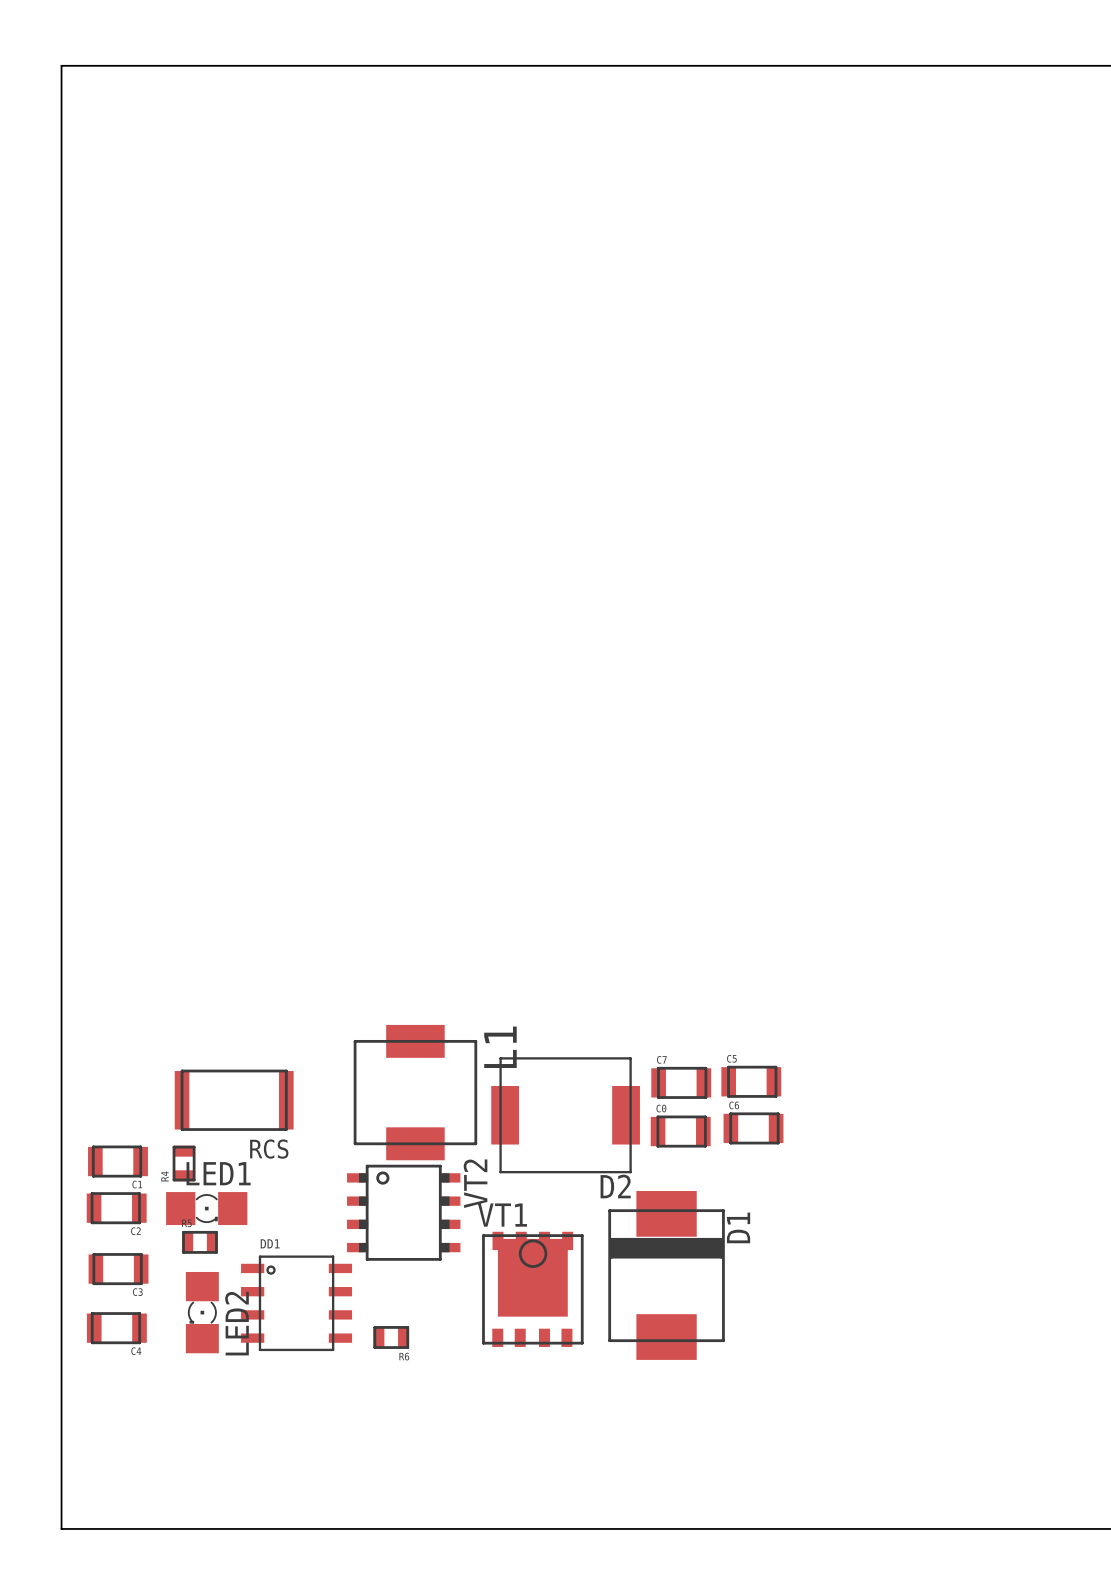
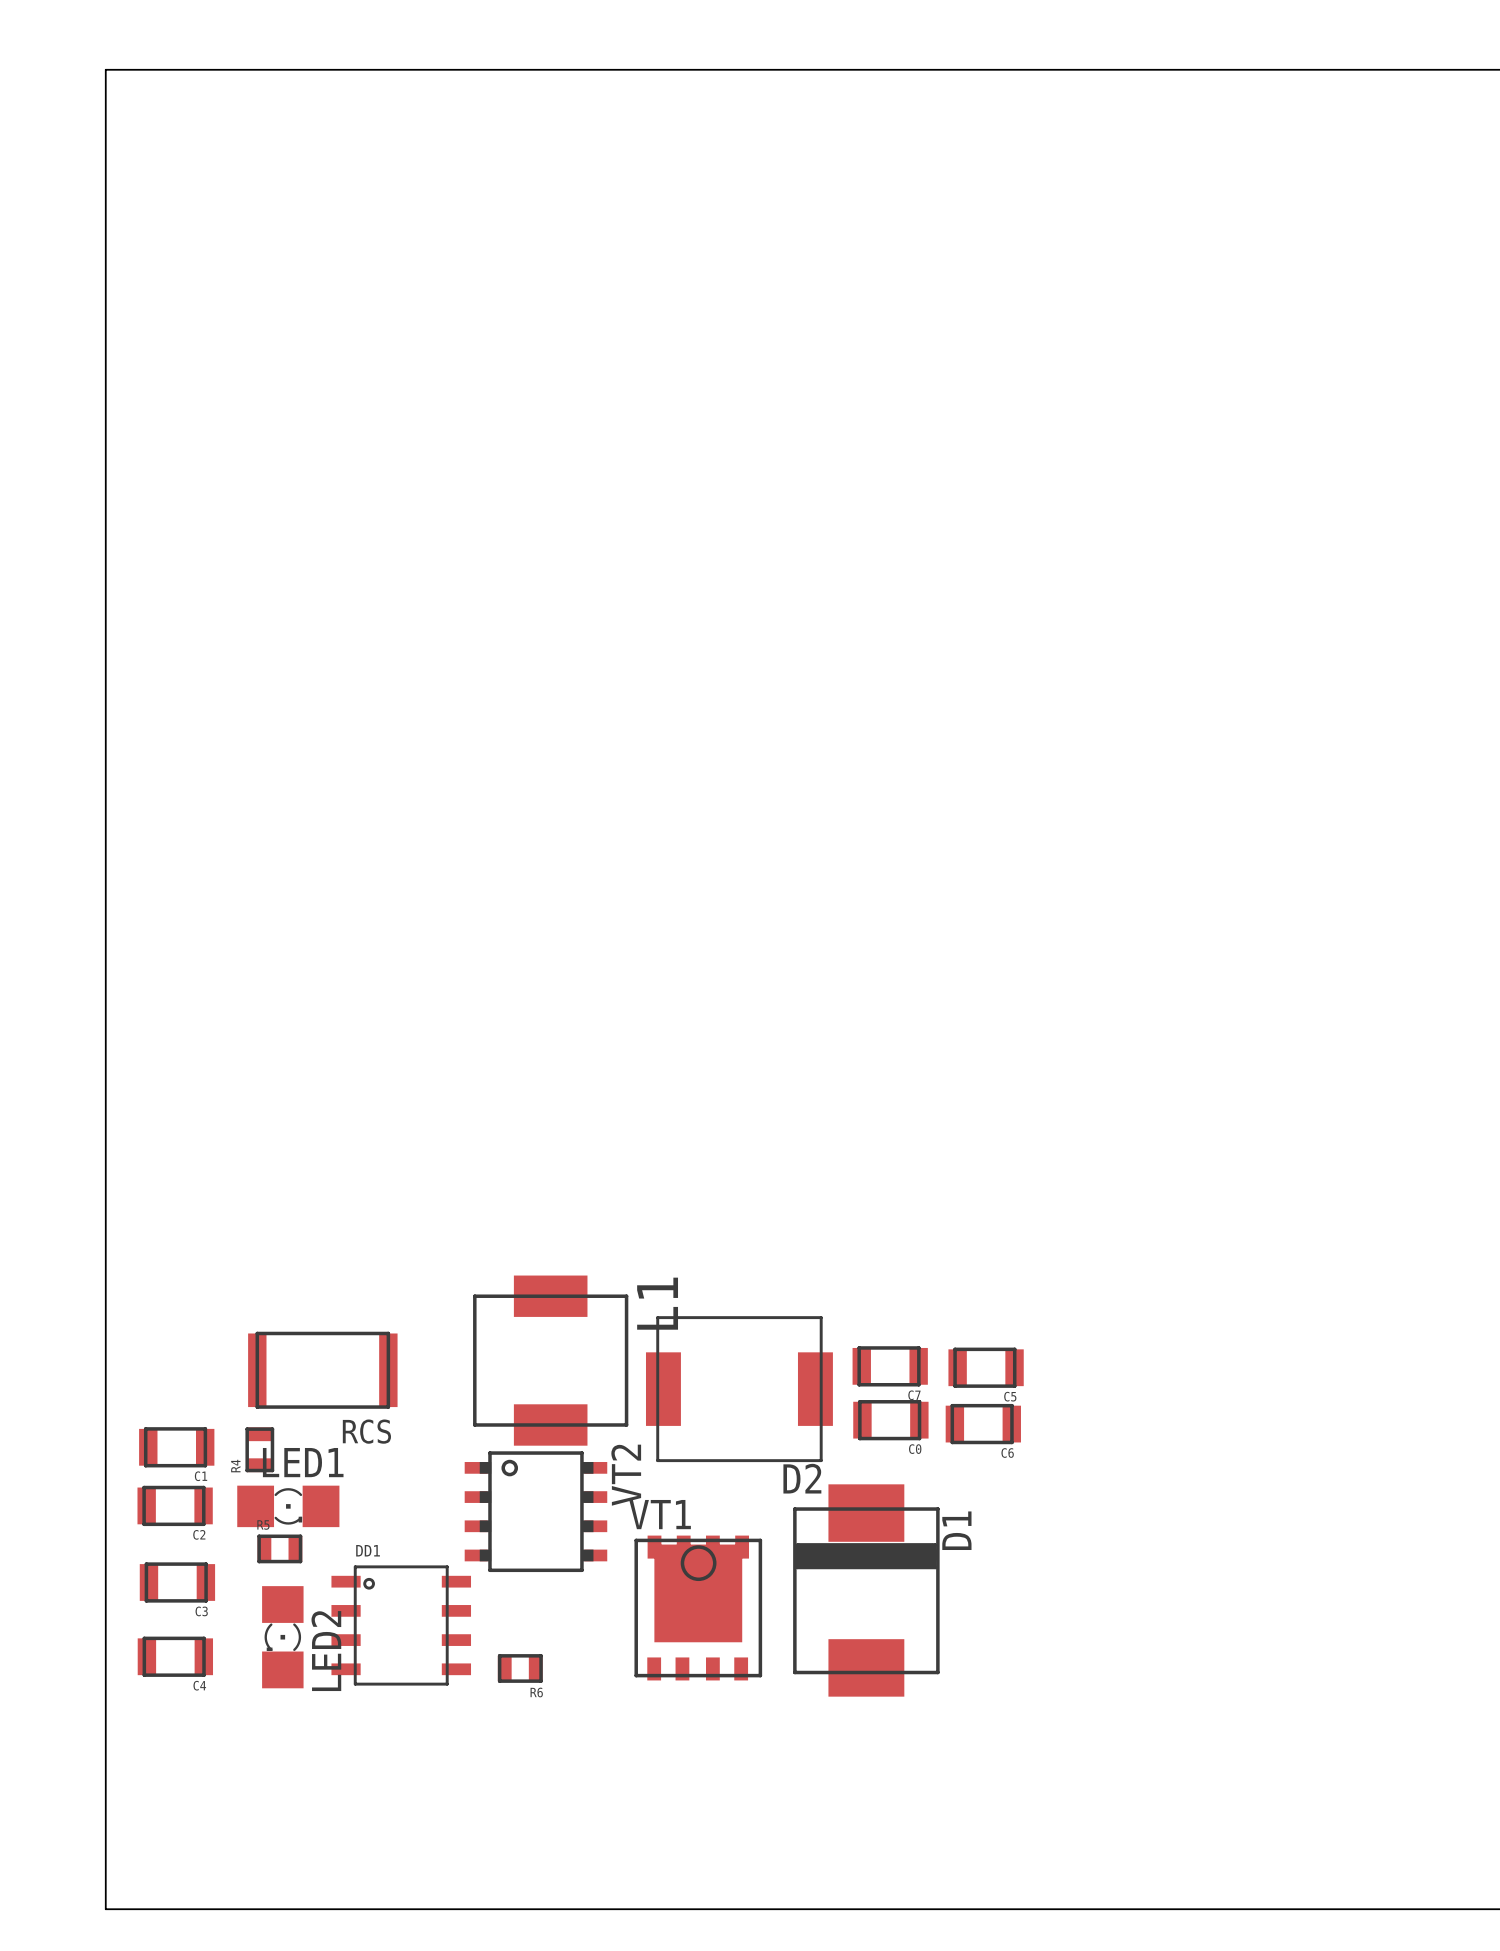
C5 rotation: 0° (751, 1081) -> 180° (986, 1367)
C7 rotation: 0° (681, 1082) -> 180° (890, 1366)
C6 rotation: 0° (753, 1128) -> 180° (983, 1424)
C0 rotation: 0° (680, 1131) -> 180° (890, 1420)

